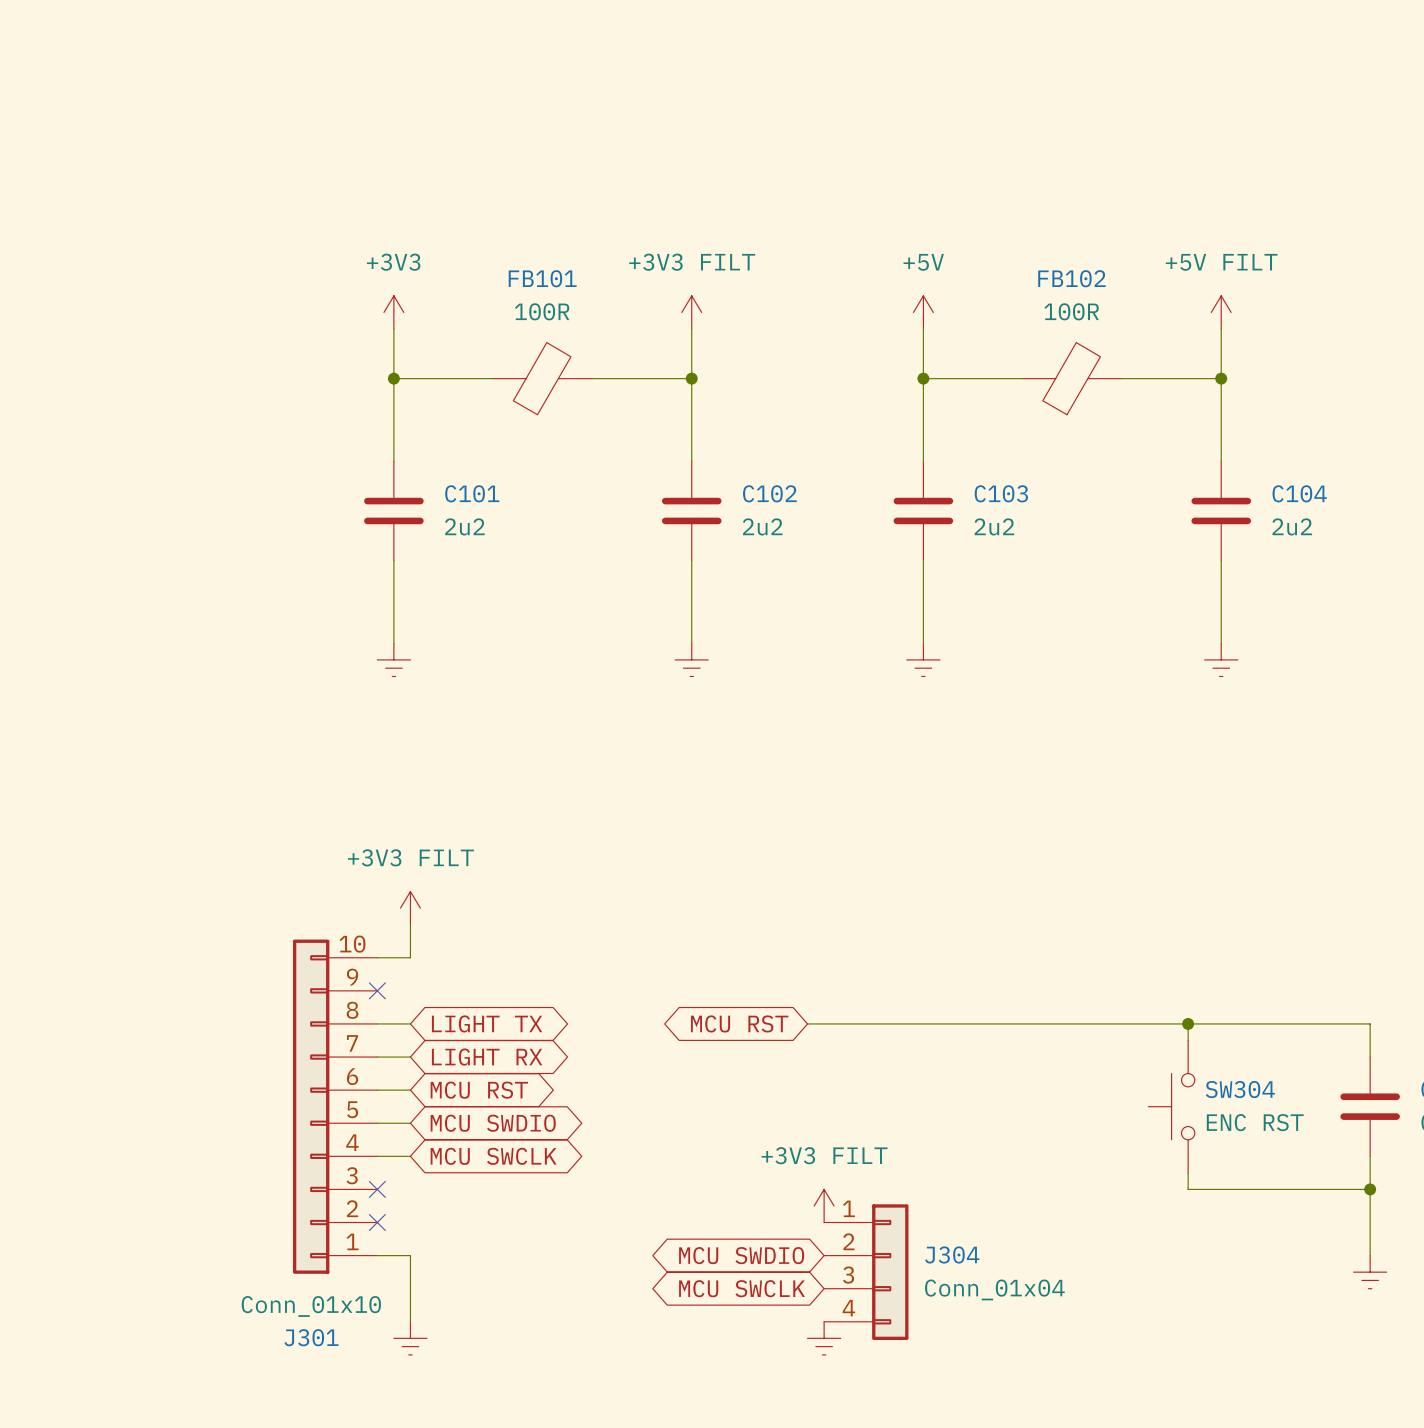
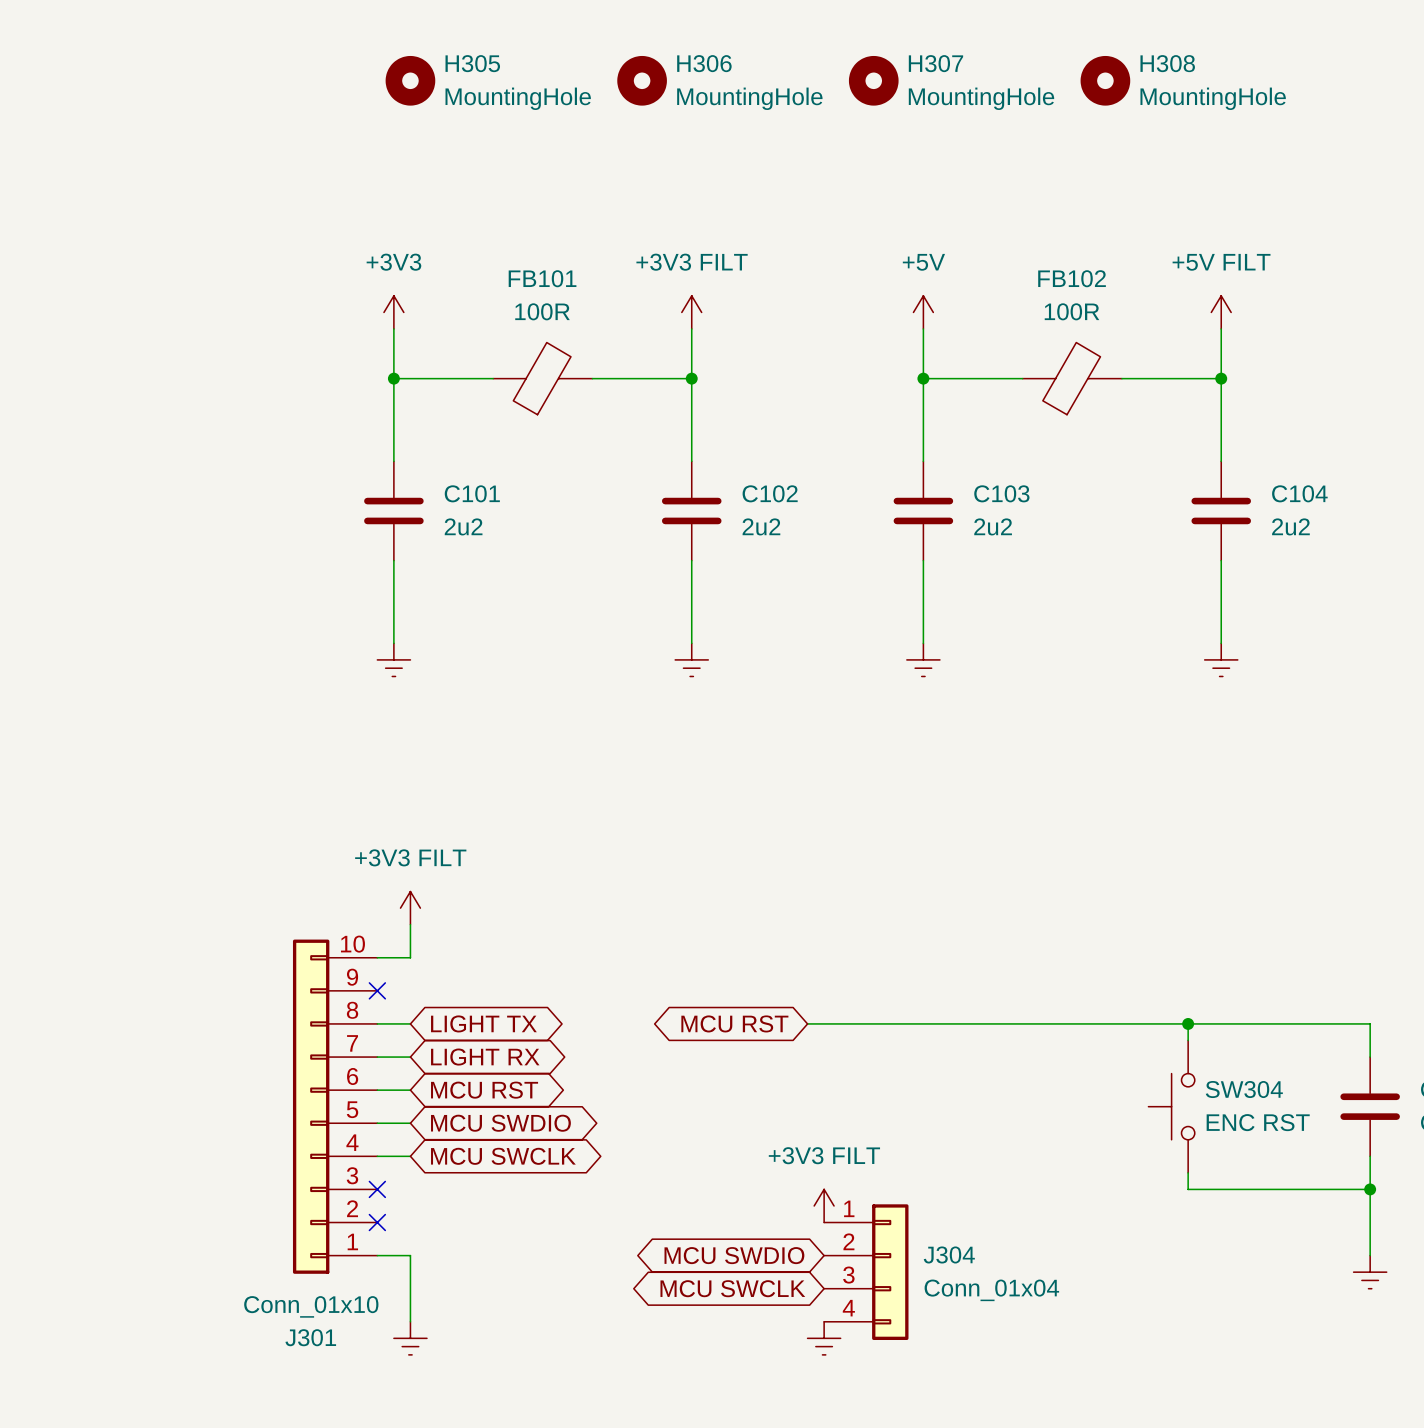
H305: none -> MountingHole (410, 80)
H306: none -> MountingHole (642, 80)
H307: none -> MountingHole (873, 80)
H308: none -> MountingHole (1105, 80)

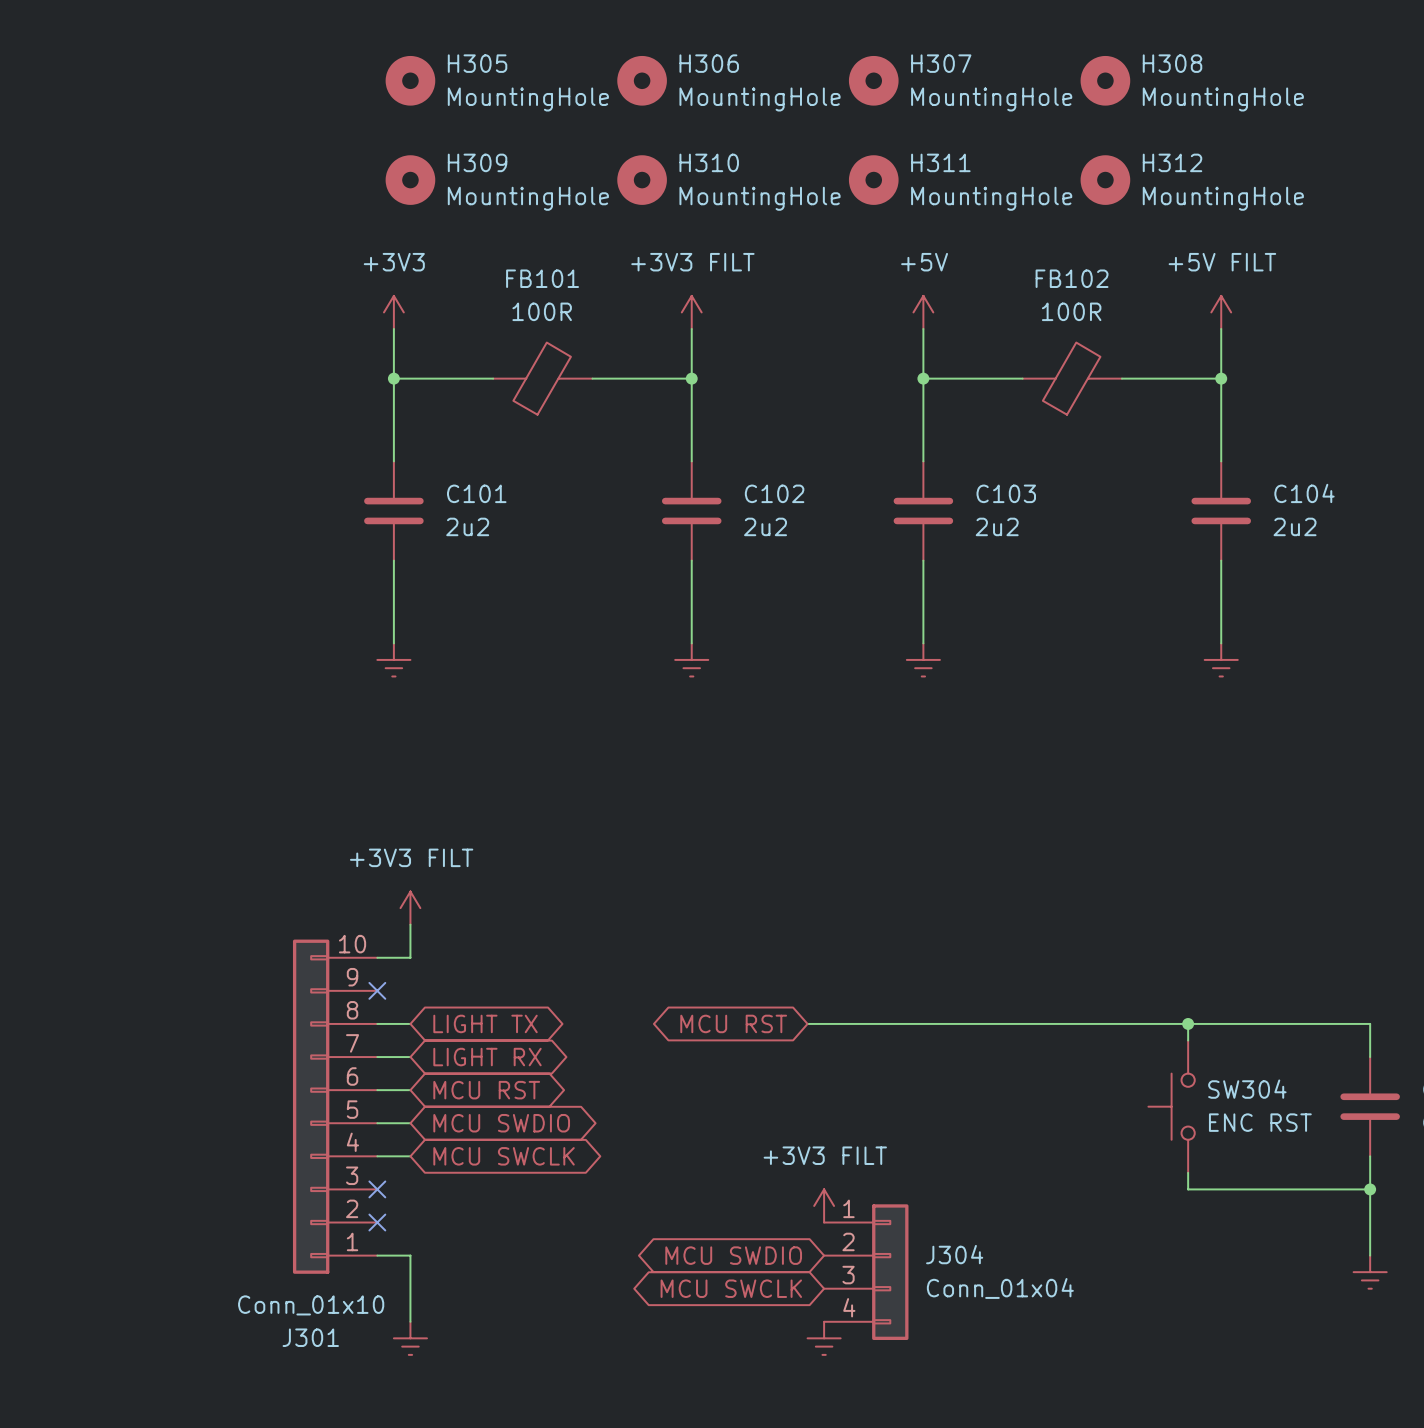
H309: none -> MountingHole (410, 180)
H310: none -> MountingHole (642, 180)
H311: none -> MountingHole (873, 180)
H312: none -> MountingHole (1105, 180)

